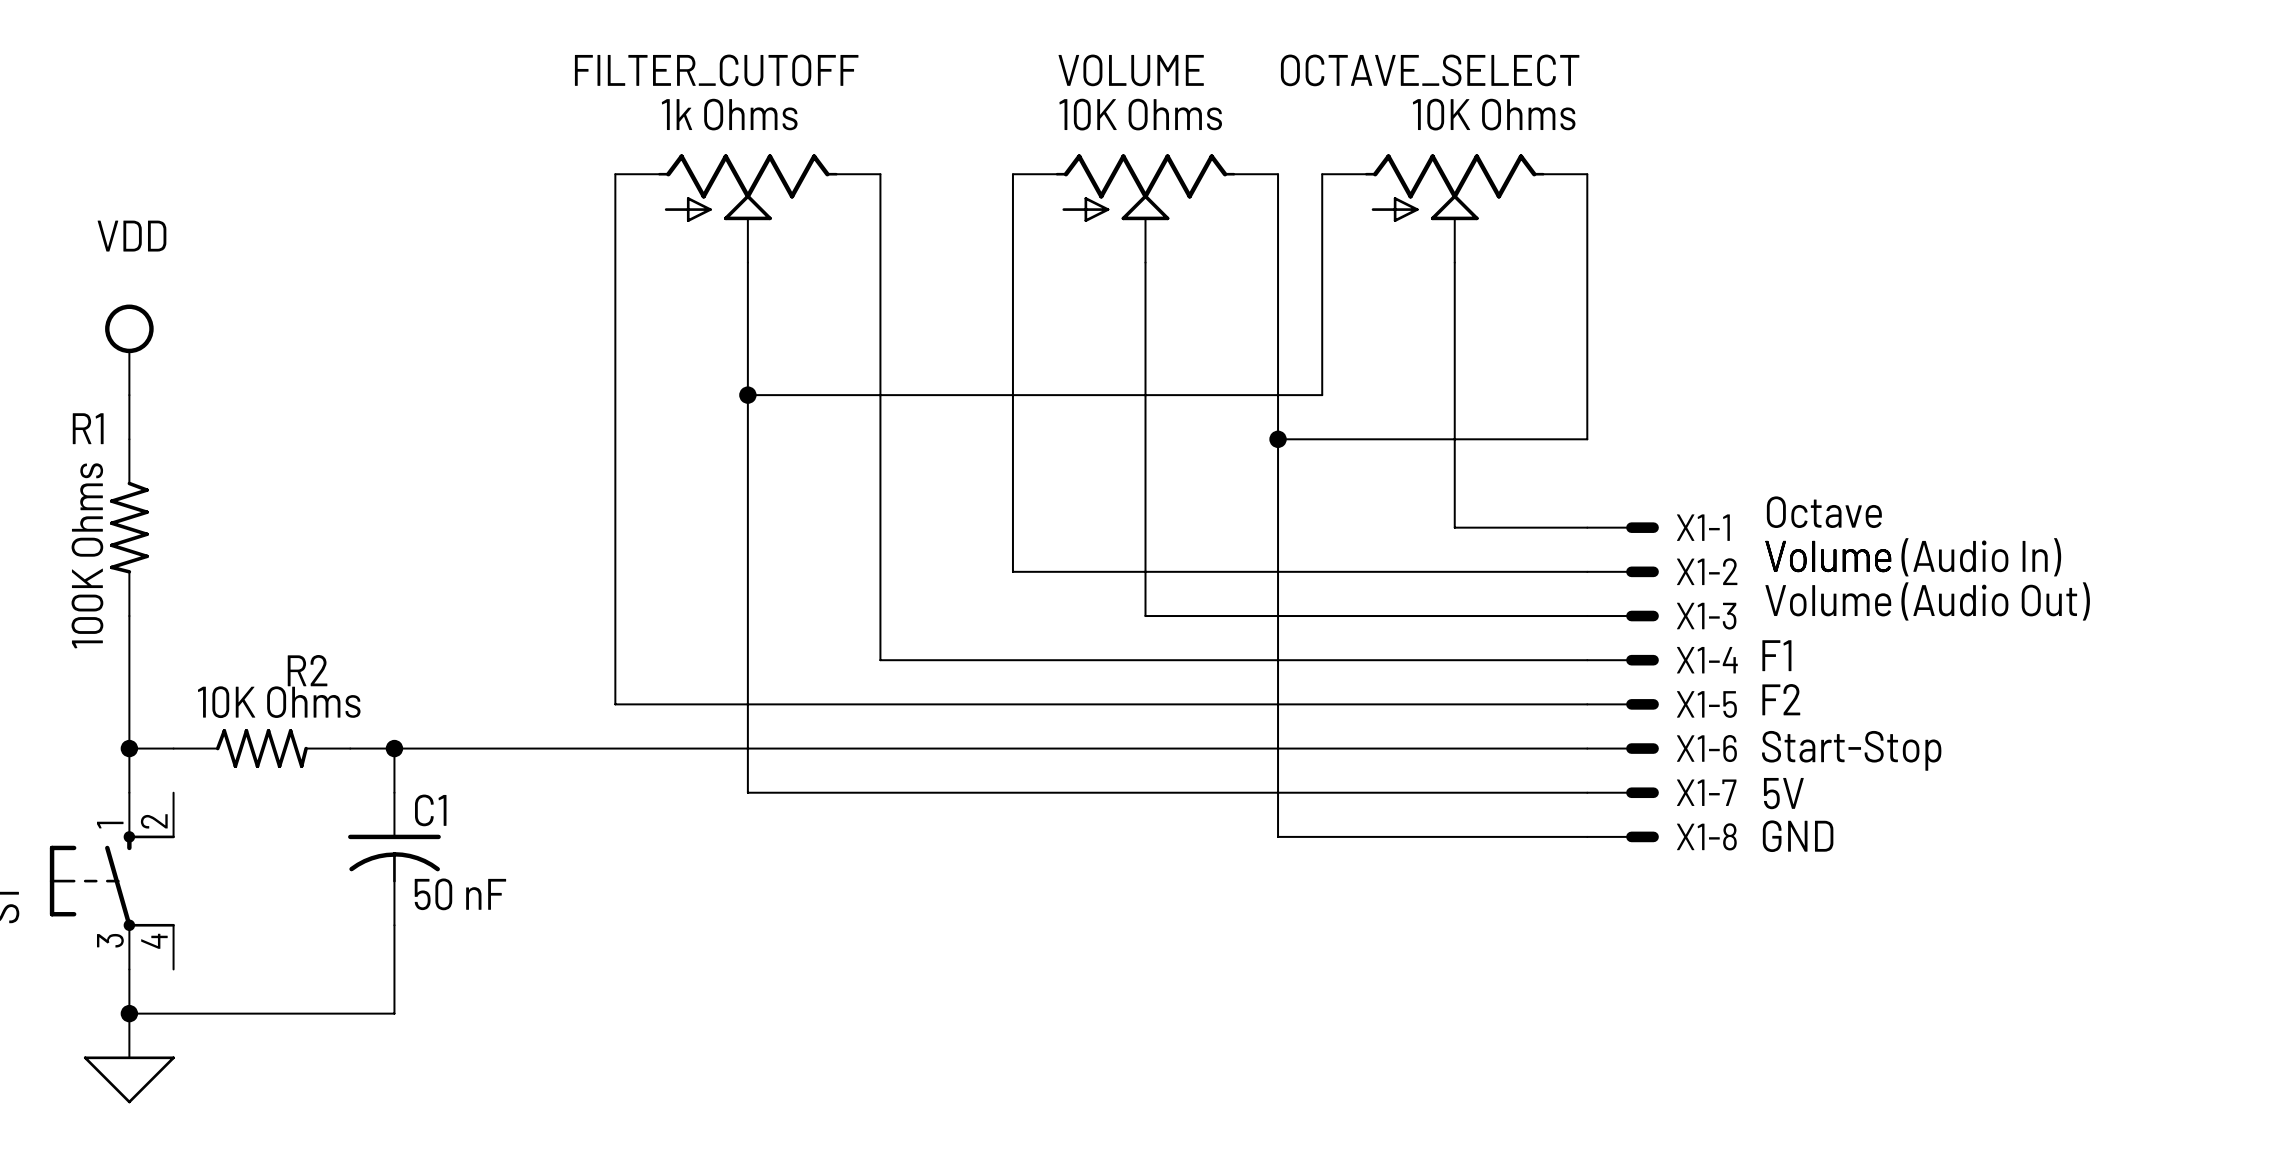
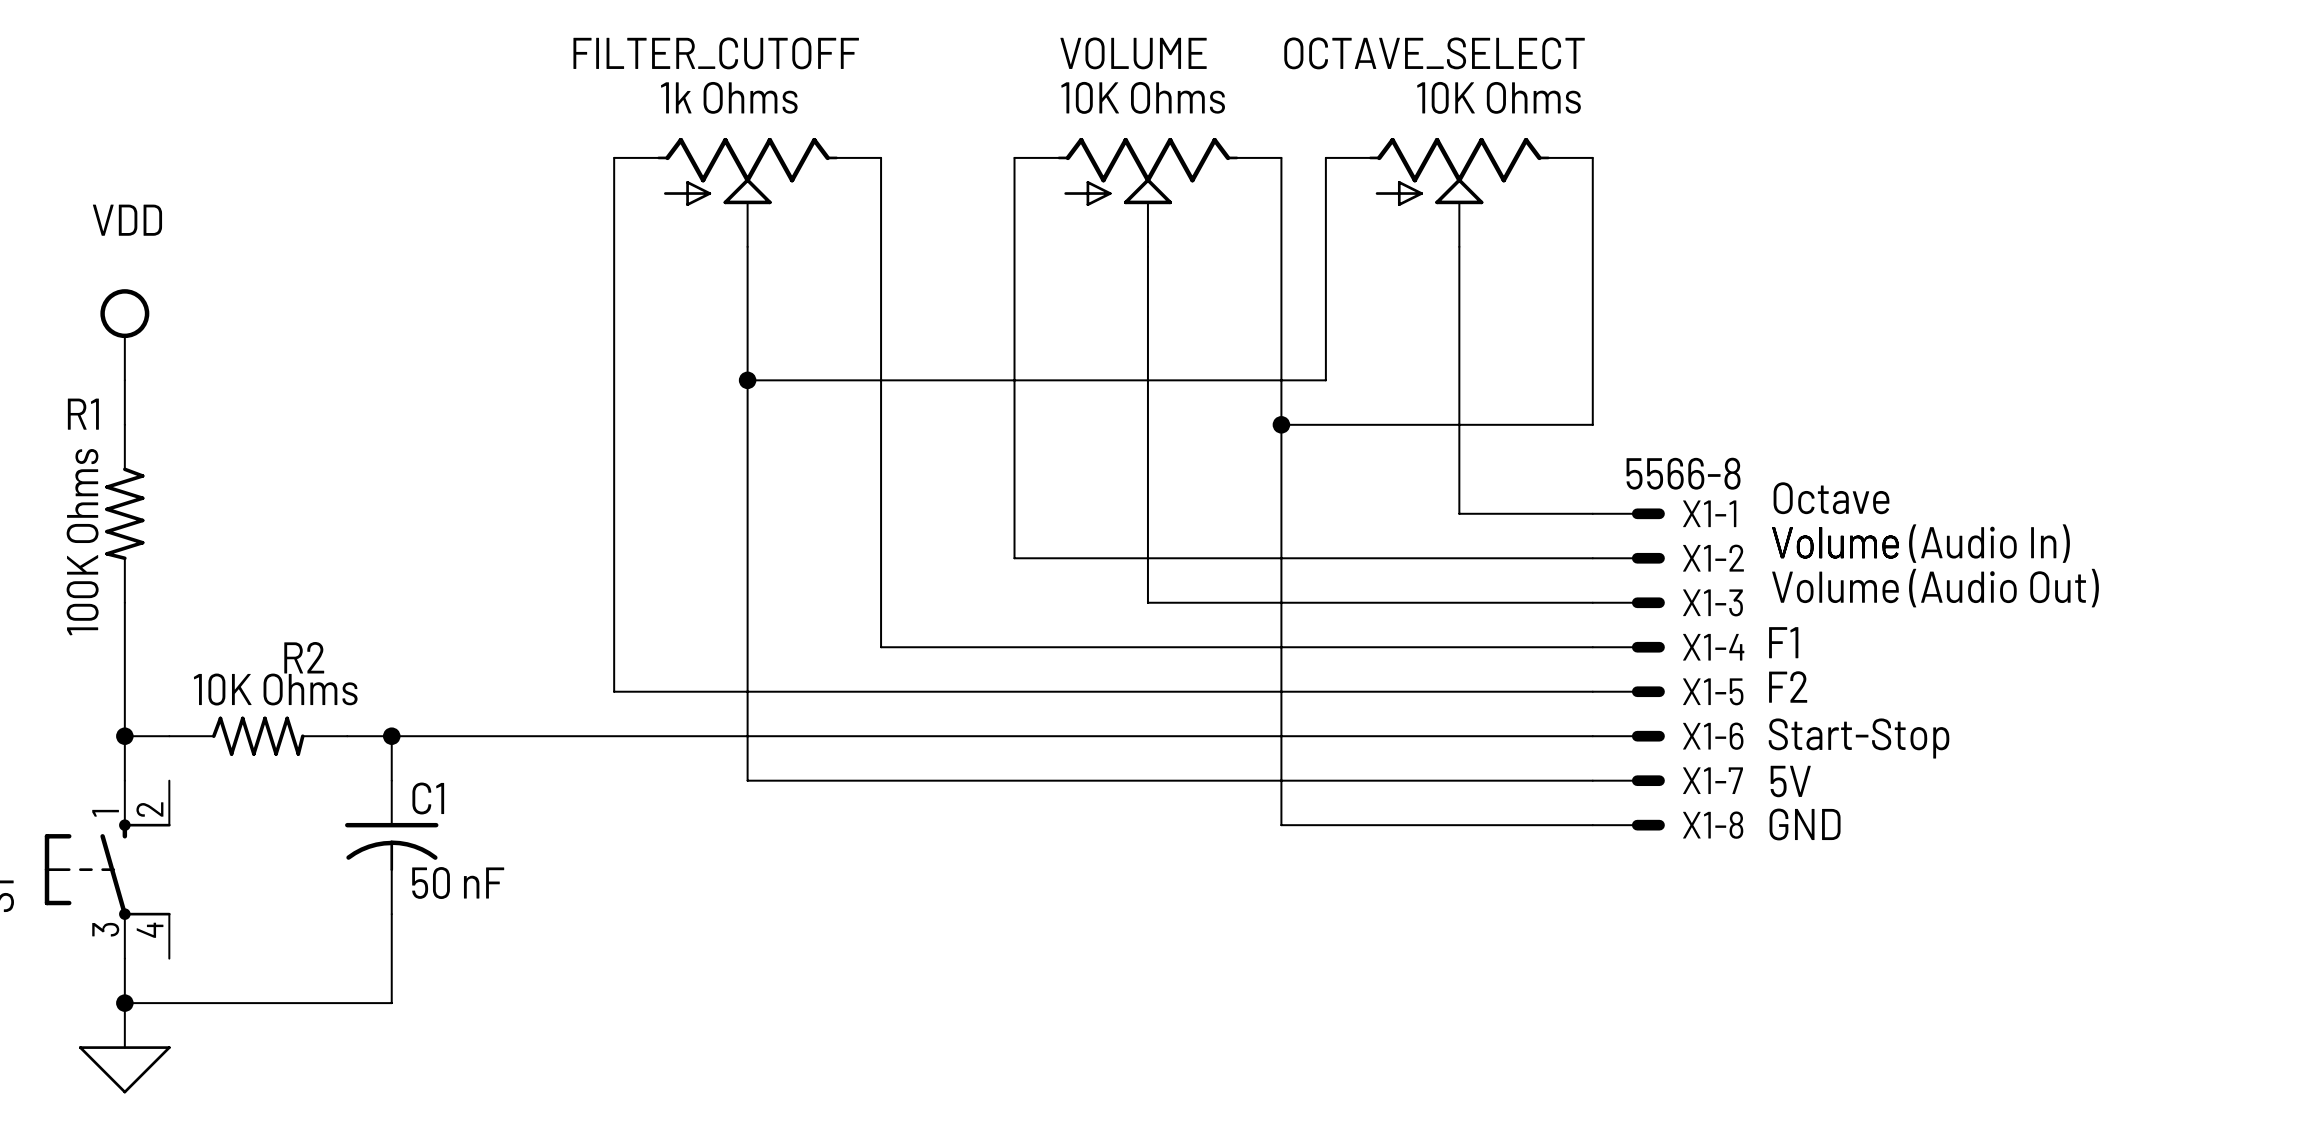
X1-1 value: none -> 5566-8 (1683, 473)

